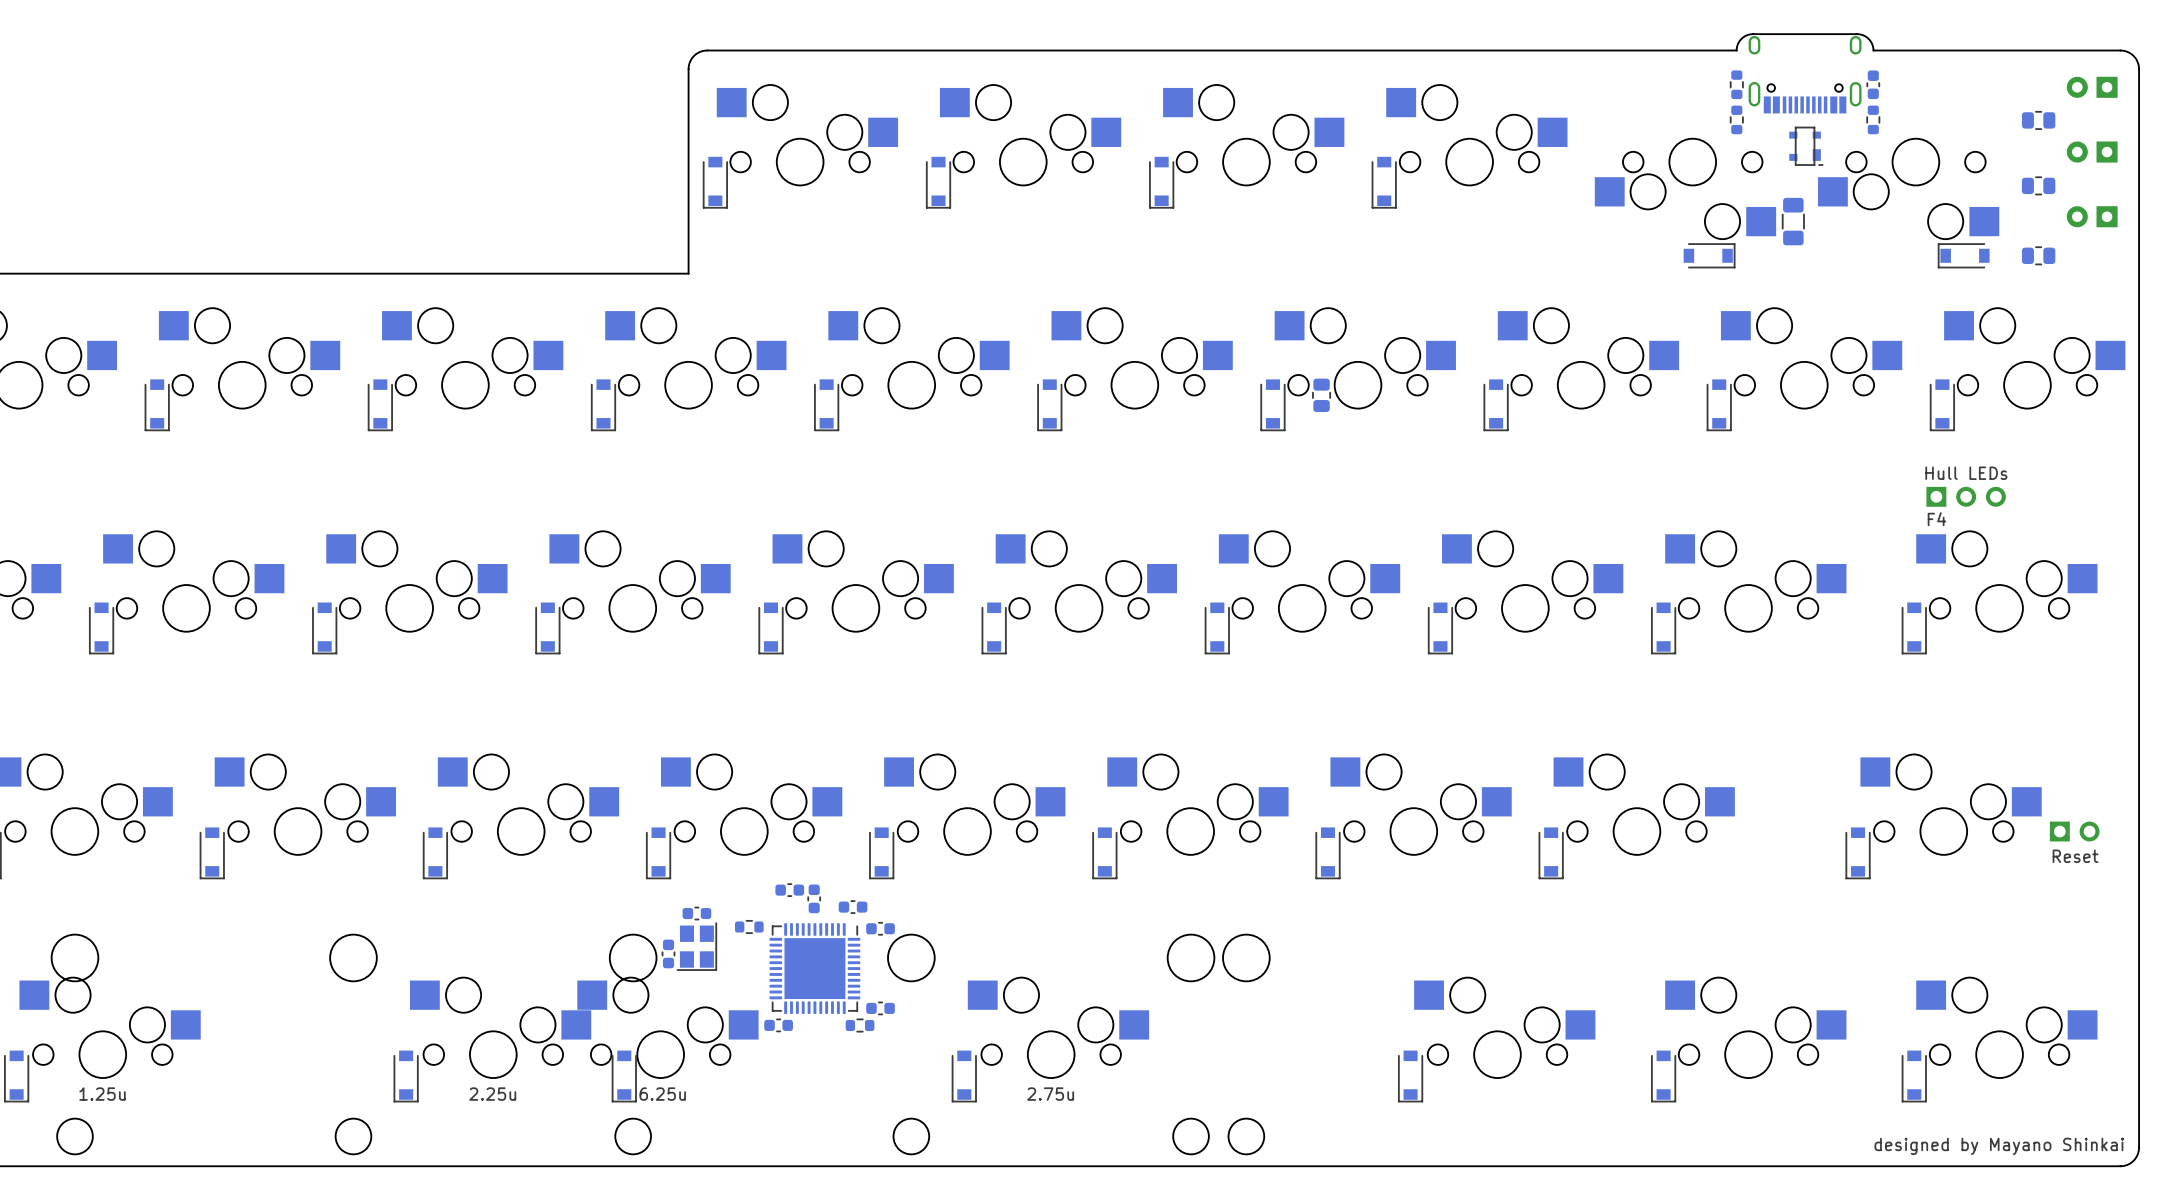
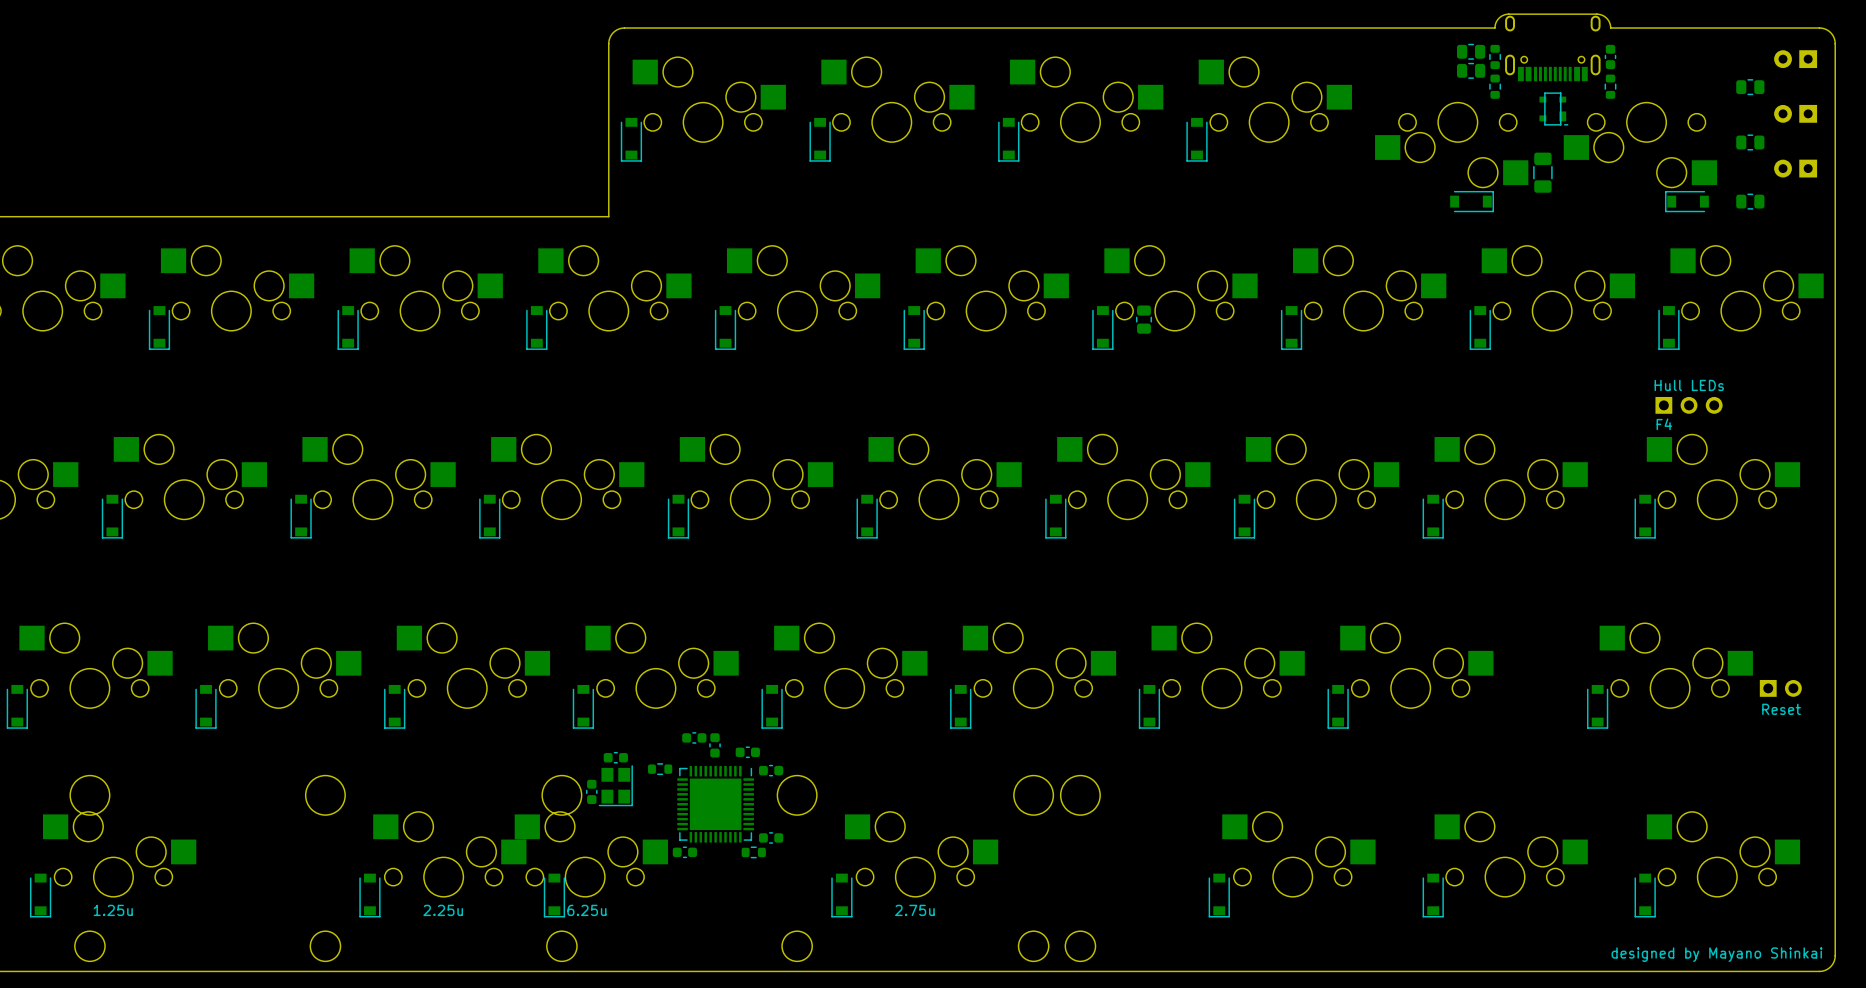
part: none -> (1471, 51)
part: none -> (1471, 70)

